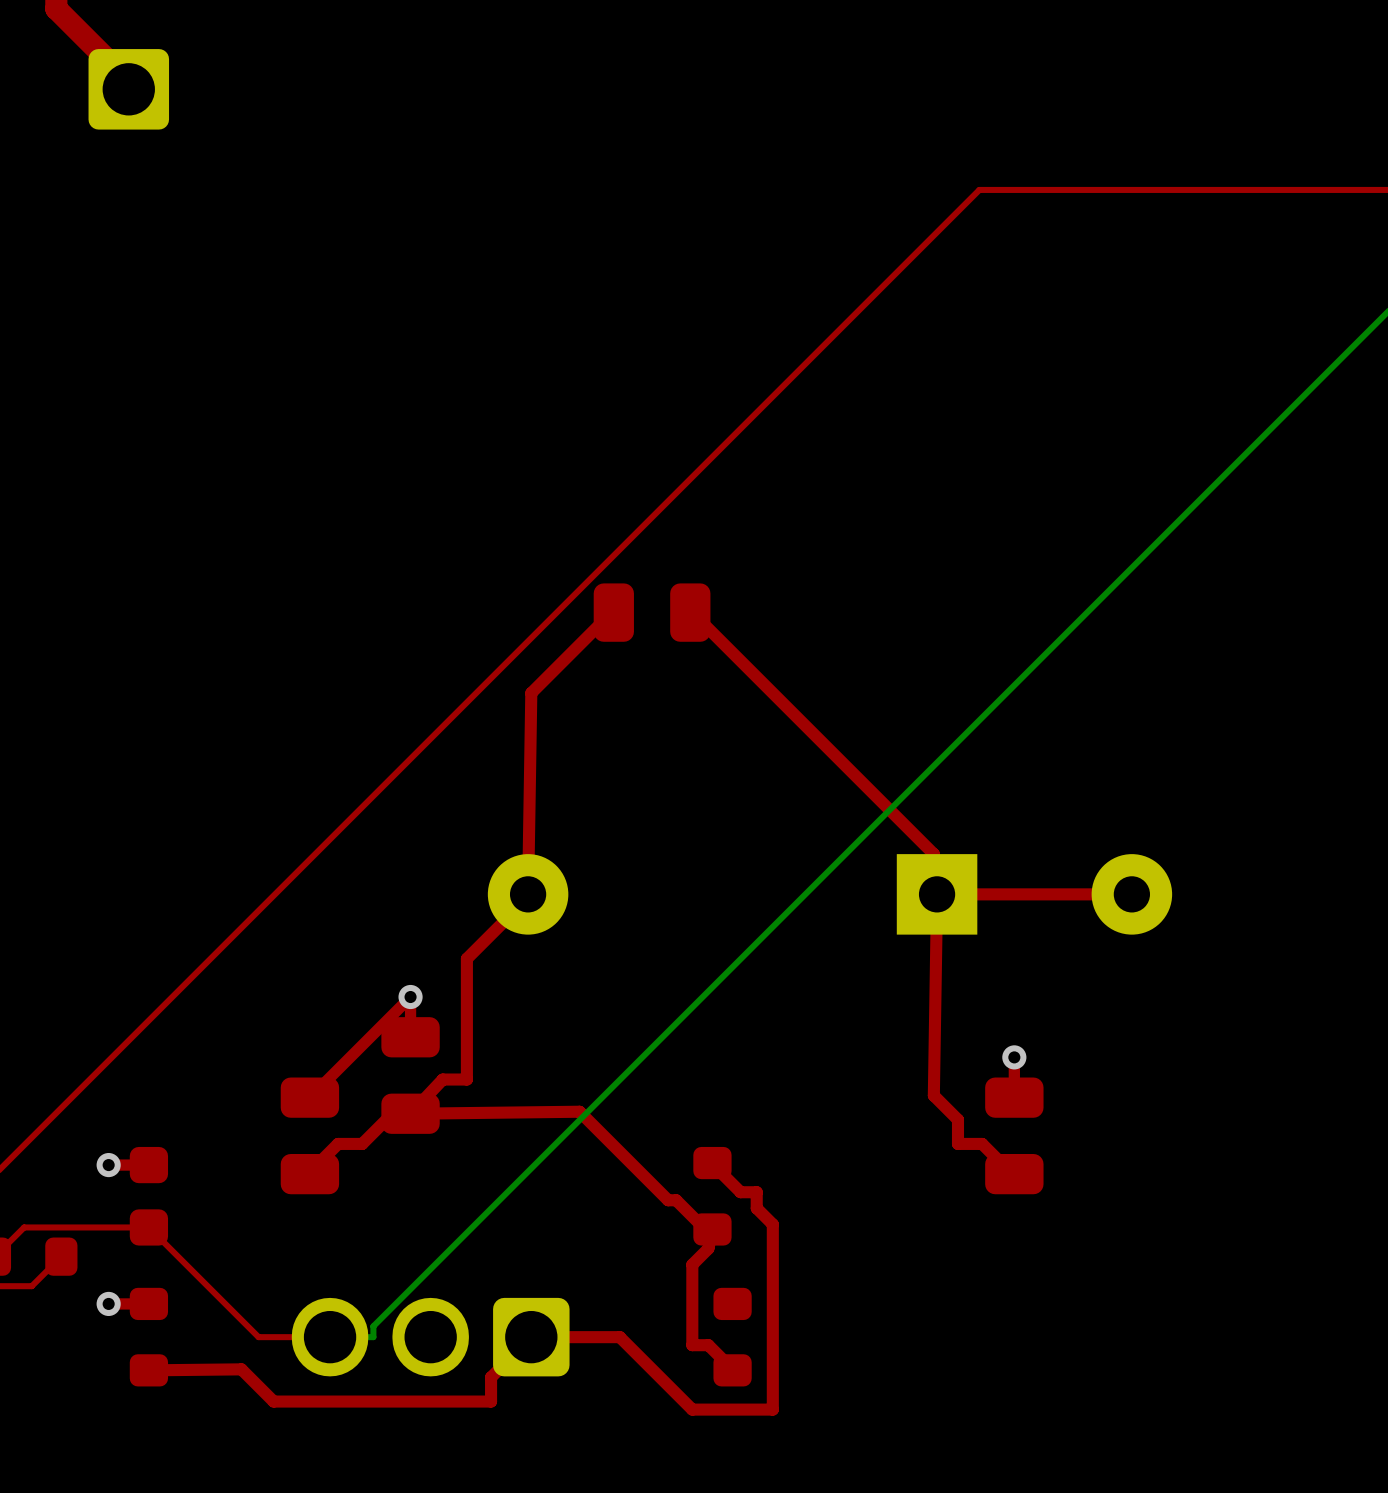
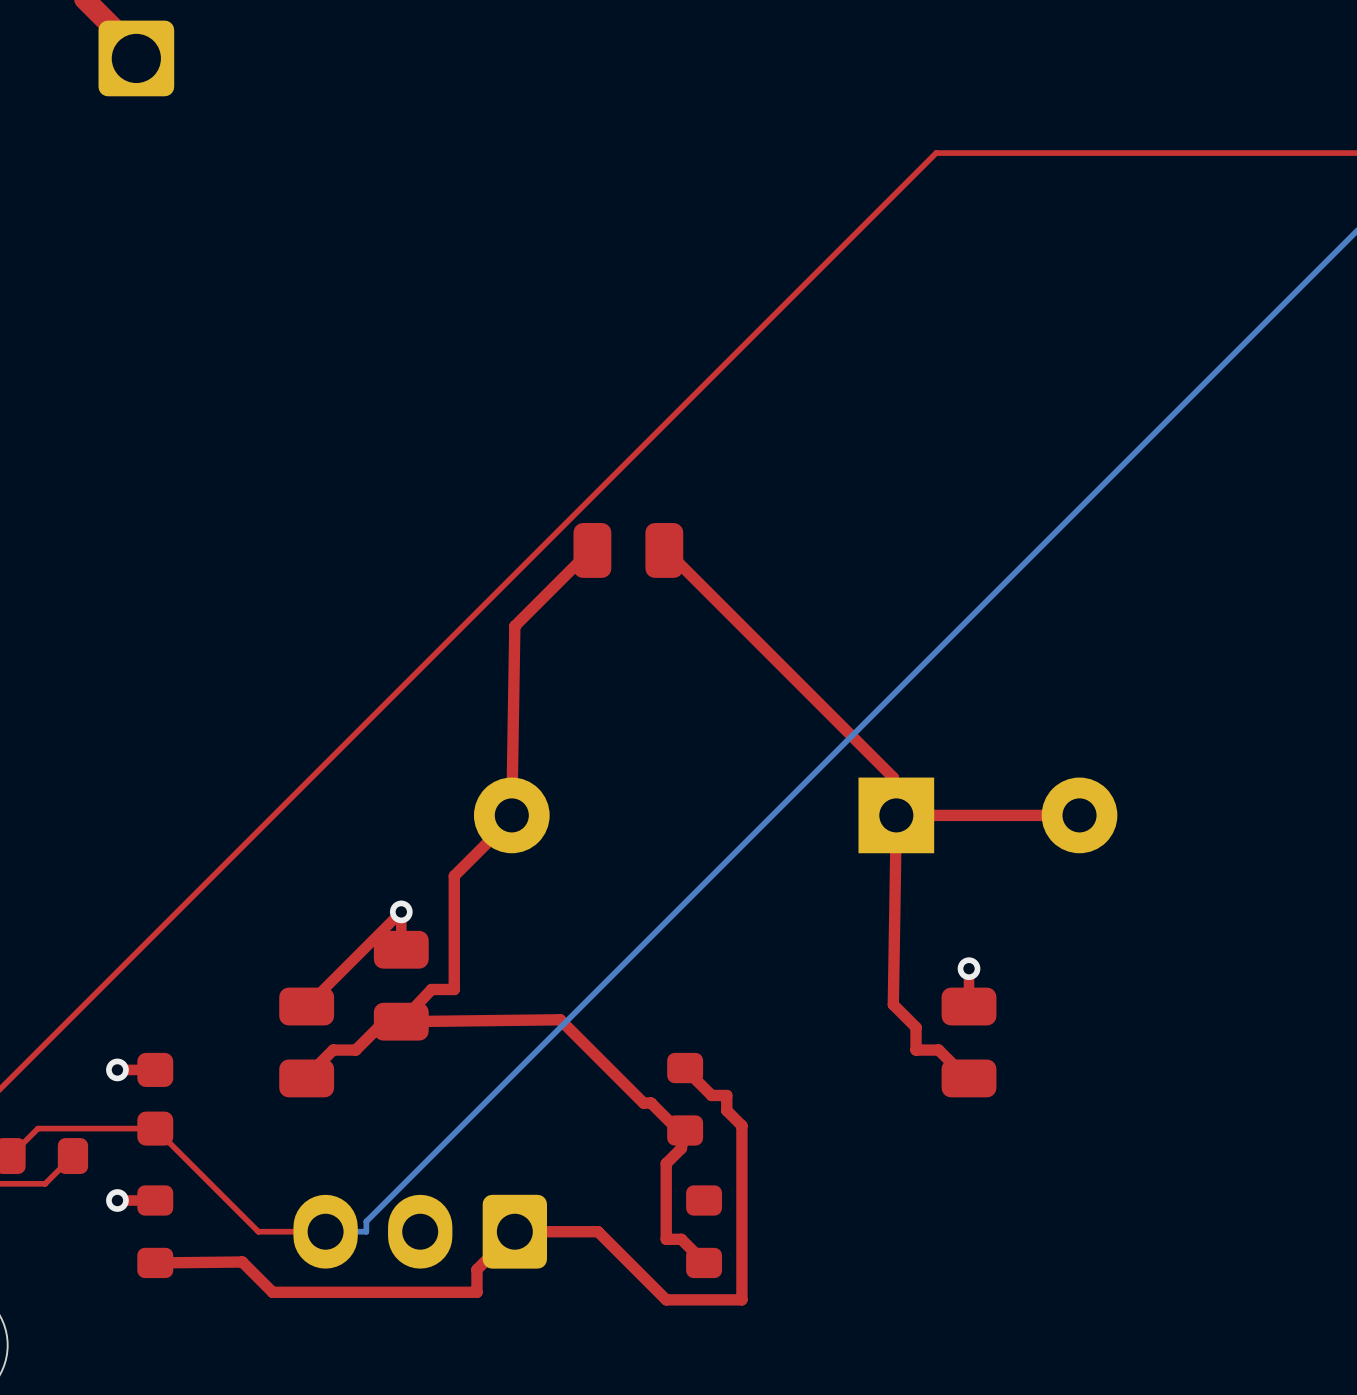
part footprint: [291, 1297, 570, 1377] -> [293, 1194, 548, 1269]

